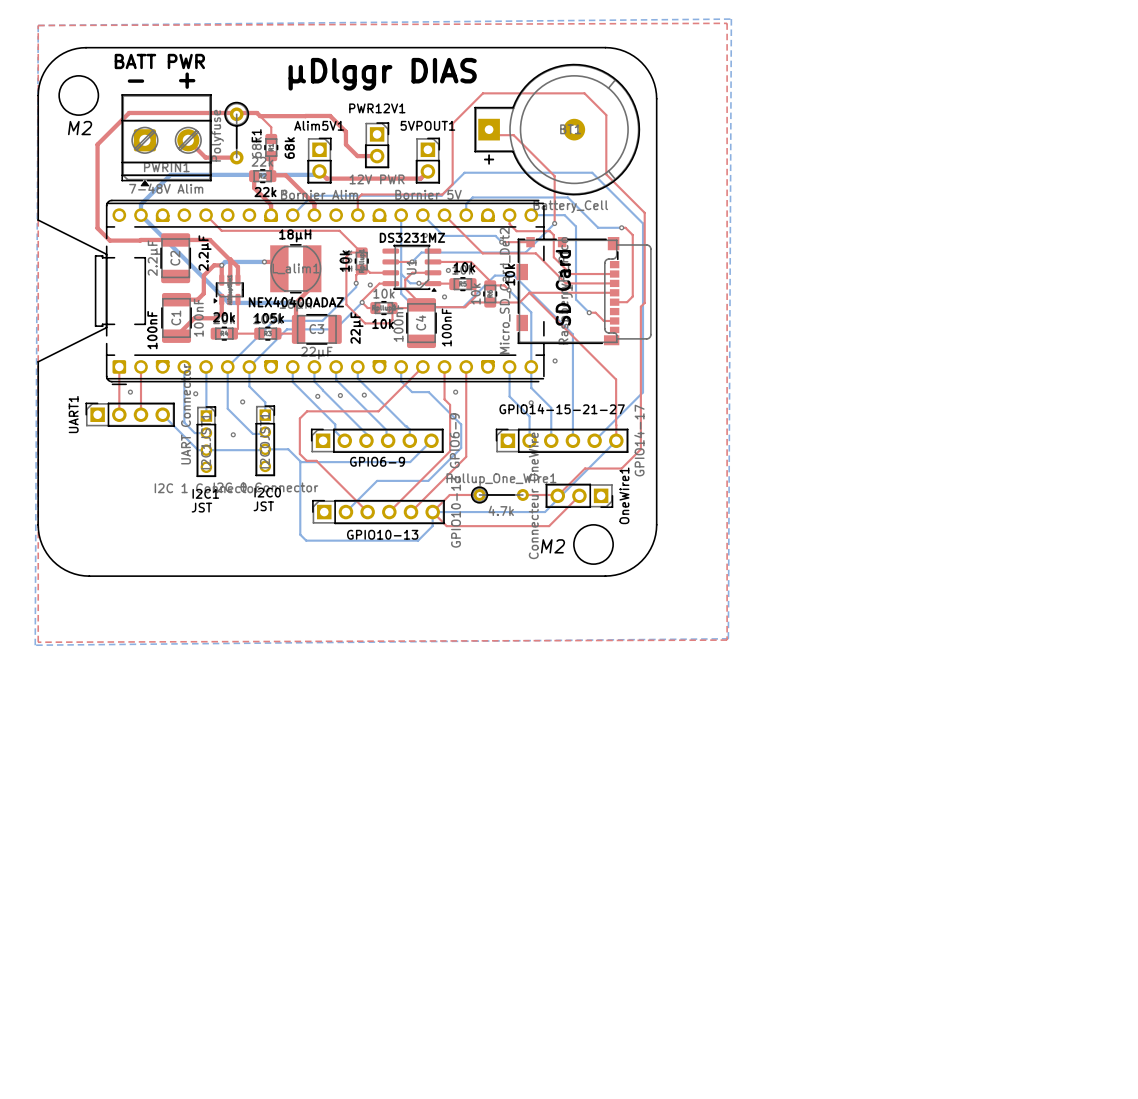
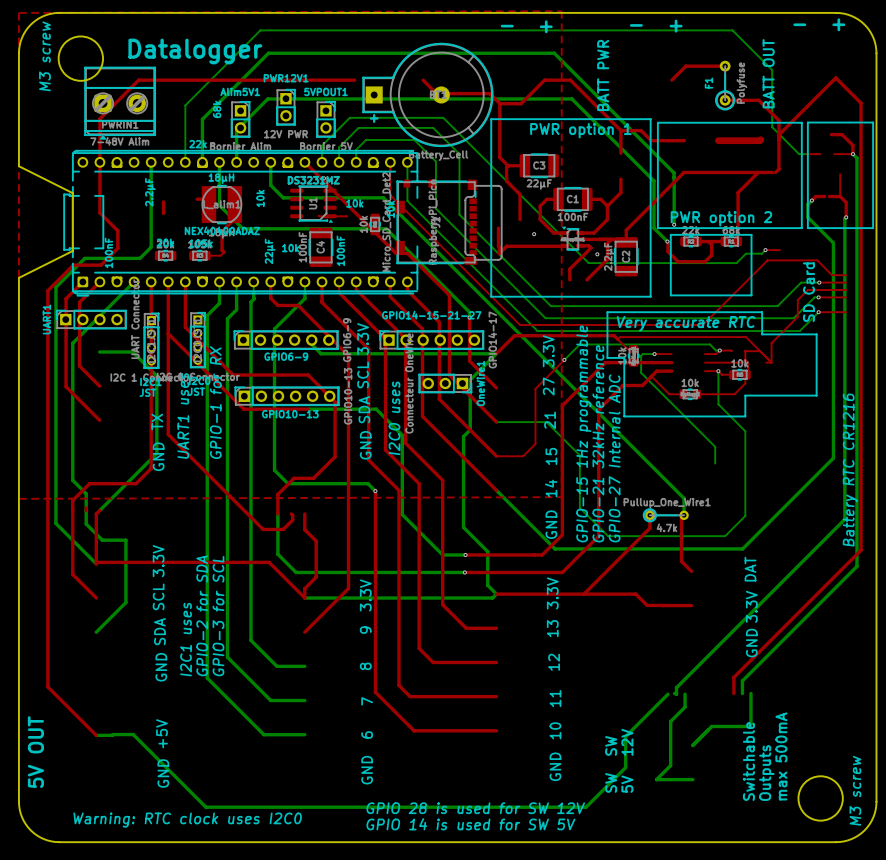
bottom zone outline: (731, 19) (38, 25) (35, 645) (728, 638) (731, 19) -> none
text: none -> - (799, 24)
text: none -> + (838, 24)
text: none -> - (636, 25)
text: none -> - (507, 26)
text: none -> + (676, 26)
text: none -> + (546, 26)
round board edge: none -> [58, 36, 104, 82]
text: BATT PWR (159, 61) -> none
text: none -> Datalogger (195, 51)
text: µDlggr DIAS (382, 74) -> none
round board edge: [58, 75, 99, 116] -> none
text: none -> M3 screw (44, 56)
text: + (187, 80) -> none
text: - (135, 81) -> none
top track: none -> (725, 66) (685, 66) (671, 80)
board edge: (38, 95) (41, 77) (49, 65) (63, 53) (81, 47) (605, 47) (620, 49) (633, 56) (650, 74) (656, 98) (656, 524) (654, 539) (648, 553) (637, 564) (625, 572) (610, 575) (89, 576) (74, 573) (60, 567) (49, 557) (39, 534) (38, 361) -> (18, 68) (19, 45) (25, 30) (40, 17) (55, 13) (836, 12) (851, 15) (861, 22) (873, 37) (876, 53) (876, 801) (874, 813) (869, 824) (855, 837) (836, 842) (59, 842) (47, 840) (36, 835) (23, 820) (18, 801) (18, 277)
text: none -> BATT OUT (768, 73)
text: none -> BATT PWR (603, 75)
top track: none -> (354, 80) (138, 80) (99, 118) (99, 212) (117, 230) (117, 248) (101, 265) (73, 265) (47, 290) (47, 686) (96, 735)
top track: none -> (423, 80) (436, 93) (489, 93) (499, 103)
top track: (260, 116) (330, 115) (345, 131) (345, 144) (357, 156) (377, 156) -> none
top track: (260, 116) (257, 112) (129, 112) (97, 144) (97, 228) (109, 240) (210, 239) (230, 259) -> none
top track: (260, 116) (271, 127) (271, 139) -> none
text: M2 (80, 128) -> none
F1 rotation: 0° (236, 133) -> 180° (725, 85)
F1 position: (236, 133) -> (725, 85)
top track: (489, 135) (513, 135) (554, 176) (554, 223) -> none
top track: none -> (725, 100) (758, 100) (778, 120) (778, 169) (775, 172)
top track: (188, 140) (205, 157) (236, 157) -> none
top track: none -> (499, 103) (499, 157) (508, 165)
top track: none -> (499, 103) (521, 103) (544, 80) (570, 80) (620, 130)
part rotation: 0° (271, 147) -> 90° clockwise (731, 241)
part position: (271, 147) -> (731, 241)
top track: (271, 156) (271, 176) (285, 175) (314, 203) (314, 215) -> none
line: none -> (491, 119) (650, 119) (650, 296) (491, 296) (491, 119)
line: none -> (657, 122) (801, 122) (801, 228) (657, 228) (657, 122)
line: none -> (807, 122) (873, 122) (873, 228) (807, 228) (807, 122)
top track: (319, 171) (326, 178) (420, 178) (427, 171) -> none
bottom track: (319, 171) (316, 174) (170, 174) (141, 204) (141, 215) (228, 302) (296, 302) -> none
top track: none -> (620, 130) (620, 153)
top track: none -> (620, 130) (641, 130) (651, 140) (684, 140)
text: none -> PWR option 1 (580, 130)
top track: (254, 176) (254, 188) (271, 204) (271, 215) -> none
part position: (262, 176) -> (690, 241)
top track: none -> (831, 134) (842, 134) (852, 145) (852, 154) (834, 154)
top track: none -> (778, 134) (835, 77) (861, 103) (861, 550) (733, 677) (733, 693)
bottom track: none -> (414, 140) (435, 161) (435, 208) (545, 318) (793, 318) (814, 297) (818, 297)
top track: none -> (760, 139) (718, 140)
bottom track: (466, 203) (472, 197) (567, 197) (598, 227) (621, 227) -> (356, 153) (356, 149) (366, 140) (415, 140)
top track: none -> (807, 154) (820, 154)
bottom track: none -> (807, 154) (799, 154) (772, 127) (772, 70) (732, 30) (260, 30) (185, 105) (185, 162)
bottom track: none -> (852, 154) (856, 158) (856, 566) (742, 680) (742, 693)
via: none -> (852, 154)
top track: (206, 215) (221, 230) (339, 230) (361, 252) -> none
bottom track: none -> (151, 162) (151, 247) (140, 258) (84, 258) (55, 287) (55, 523) (96, 563)
bottom track: none -> (202, 162) (202, 119) (268, 53) (554, 53) (674, 172) (674, 224)
bottom track: (292, 215) (312, 195) (441, 195) (464, 172) (592, 172) (643, 223) (643, 392) (594, 440) -> (219, 162) (219, 205) (242, 228) (386, 228) (469, 312) (469, 317)
bottom track: none -> (236, 162) (236, 130) (267, 98) (571, 98) (653, 181) (653, 228) (667, 241)
top track: (357, 215) (357, 198) (361, 194) (442, 194) (452, 184) (452, 123) (482, 93) (584, 93) (606, 115) (606, 174) (644, 212) (644, 302) (640, 306) (640, 449) (621, 468) (585, 468) (557, 495) (522, 494) -> none
bottom track: none -> (270, 162) (270, 185) (283, 197) (383, 197) (684, 498) (684, 515)
top track: none -> (304, 162) (395, 253) (407, 253) (449, 295) (449, 375) (496, 422)
bottom track: (401, 215) (401, 293) (416, 309) (427, 309) (429, 307) (463, 307) (494, 275) (514, 275) (572, 334) (572, 440) -> none
bottom track: (422, 215) (443, 235) (495, 235) (501, 242) -> (322, 162) (322, 145) (349, 117) (443, 117) (588, 263) (736, 263) (746, 253) (761, 253) (765, 250)
top track: (444, 215) (482, 253) (535, 253) (565, 283) (614, 283) -> none
bottom track: none -> (339, 162) (339, 147) (358, 127) (433, 127) (459, 154) (459, 214) (550, 306) (777, 306) (801, 282) (819, 282)
bottom track: (531, 215) (564, 215) (576, 226) (576, 299) (589, 312) -> (407, 162) (407, 200) (537, 331) (799, 331) (818, 312)
top track: none -> (508, 165) (506, 181) (520, 194) (520, 219)
top track: none -> (508, 165) (524, 165)
bottom track: (554, 223) (525, 252) (421, 252) (412, 261) -> none
via: (554, 223) -> none
top track: (509, 224) (516, 231) (549, 231) (553, 235) (553, 257) (570, 274) (614, 274) -> (390, 169) (390, 195) (520, 324) (702, 324) (767, 260) (817, 260) (832, 275) (846, 275)
top track: (621, 227) (625, 227) (632, 235) (632, 296) (627, 302) (614, 302) -> none
via: (621, 227) -> none
top track: none -> (758, 172) (738, 192) (738, 241)
top track: none -> (772, 172) (683, 172) (626, 230) (626, 239) (623, 241)
top track: none -> (840, 174) (840, 196)
top track: none -> (620, 179) (620, 192) (607, 206)
top track: (501, 242) (530, 242) -> none
via: (501, 242) -> none
top track: (366, 252) (350, 252) (346, 256) (346, 304) (365, 323) (389, 323) (392, 319) (392, 308) (420, 308) (425, 302) -> none
C2 position: (175, 258) -> (626, 256)
top track: none -> (824, 196) (815, 196) (811, 200)
top track: none -> (829, 196) (840, 196)
top track: none -> (840, 196) (846, 202) (846, 217)
top track: (230, 259) (237, 267) (237, 280) -> none
top track: (230, 259) (229, 280) -> none
bottom track: (264, 261) (225, 261) (221, 265) -> none
via: (264, 261) -> none
part position: (361, 261) -> (633, 355)
top track: (390, 261) (412, 261) -> none
via: (412, 261) -> none
top track: (433, 261) (471, 261) (489, 280) (490, 285) (504, 285) (509, 290) -> none
top track: none -> (558, 199) (546, 199) (540, 206) (540, 219) (553, 233) (565, 233)
top track: none -> (587, 199) (600, 199) (607, 206)
bottom track: none -> (811, 200) (807, 204) (807, 217) (833, 242) (833, 458) (742, 548) (554, 548) (496, 490)
via: none -> (811, 200)
via: (221, 265) -> none
top track: (222, 265) (214, 265) (203, 275) (203, 293) (197, 299) (176, 299) -> none
via: (448, 270) -> none
top track: none -> (607, 206) (607, 219) (594, 233) (580, 233)
top track: (390, 272) (370, 272) (366, 269) (361, 269) (356, 275) (356, 283) -> none
top track: (433, 272) (412, 272) (405, 279) (405, 288) (419, 302) (425, 302) -> none
bottom track: (401, 274) (410, 283) (418, 283) -> none
bottom track: (356, 283) (356, 287) (322, 320) (273, 320) (227, 366) (227, 408) (252, 433) (265, 433) -> none
via: (356, 283) -> none
top track: (390, 283) (379, 283) (362, 300) (367, 308) (378, 308) -> none
via: (418, 283) -> none
via: (370, 284) -> none
part position: (462, 284) -> (739, 374)
top track: (475, 284) (475, 296) (465, 307) (430, 307) (425, 302) -> none
bottom track: none -> (846, 217) (844, 519) (676, 687) (676, 694) (674, 693)
via: none -> (846, 217)
text: none -> PWR option 2 (721, 218)
text: SD Card (563, 287) -> none
part rotation: 0° (228, 289) -> 90° clockwise (572, 238)
part position: (228, 289) -> (572, 238)
bottom track: (509, 290) (531, 312) (531, 387) (551, 407) (551, 440) -> none
via: (509, 290) -> none
top track: (529, 292) (616, 379) (616, 440) -> none
top track: (529, 292) (519, 302) (469, 302) -> none
top track: (529, 292) (614, 292) -> none
via: none -> (674, 224)
via: (444, 296) -> none
top track: none -> (498, 228) (499, 253) (506, 246) (565, 245)
top track: (221, 299) (221, 313) (216, 318) (194, 318) (176, 336) -> none
top track: (237, 299) (237, 328) (232, 333) (255, 333) -> none
bottom track: (362, 302) (335, 329) (286, 329) (249, 366) (249, 386) (265, 402) (265, 416) -> none
via: (362, 302) -> none
via: none -> (534, 234)
line: none -> (670, 234) (751, 234) (751, 295) (670, 295) (670, 234)
part position: (383, 308) -> (690, 394)
top track: (589, 312) (595, 312) (603, 320) (614, 320) -> none
via: (589, 312) -> none
top track: none -> (580, 239) (620, 239)
top track: none -> (611, 239) (607, 243) (607, 259) (586, 279)
top track: none -> (667, 241) (667, 251) (678, 261) (704, 261) (711, 255) (711, 244) (708, 241)
via: none -> (667, 241)
top track: none -> (697, 241) (724, 241)
C1 rotation: 0° (176, 317) -> 90° clockwise (572, 199)
C1 position: (176, 317) -> (572, 199)
top track: none -> (580, 245) (588, 245) (590, 247) (569, 269) (569, 279)
top track: none -> (765, 250) (779, 250)
via: none -> (765, 250)
C3 position: (316, 329) -> (539, 165)
via: none -> (597, 254)
via: (555, 360) -> none
top track: (119, 366) (119, 414) -> (82, 281) (66, 298) (66, 386) (99, 420)
top track: (141, 366) (141, 414) -> (99, 281) (79, 302) (79, 366) (99, 386)
bottom track: (184, 366) (184, 422) (194, 433) (206, 433) -> (134, 281) (72, 343) (72, 480) (86, 493) (86, 524) (102, 540) (125, 540) (125, 602) (96, 632)
top track: none -> (151, 281) (151, 468) (135, 483) (89, 483) (72, 500) (72, 574) (96, 598)
bottom track: (206, 366) (206, 416) -> none
top track: none -> (168, 281) (168, 434) (263, 529) (283, 529) (292, 520) (291, 513)
top track: none -> (185, 281) (185, 327) (233, 375) (308, 375) (335, 401) (335, 456) (313, 478) (294, 478) (277, 494) (277, 513)
top track: none -> (270, 281) (270, 298) (277, 305) (298, 305) (348, 355) (348, 588) (304, 632)
bottom track: (357, 366) (357, 378) (409, 429) (409, 440) -> none
top track: (422, 366) (378, 411) (307, 411) (299, 418) (299, 454) (306, 460) (316, 460) (367, 512) -> (322, 281) (321, 302) (368, 349) (368, 460) (398, 490) (398, 685) (410, 696) (496, 696)
top track: none -> (390, 281) (390, 296) (422, 329) (422, 416) (496, 490)
bottom track: (509, 366) (509, 396) (529, 416) (529, 440) -> none
top track: none -> (407, 281) (407, 290) (439, 322) (439, 399) (496, 456) (523, 456) (535, 444) (535, 388) (564, 359)
top track: none -> (819, 282) (846, 282)
via: none -> (819, 282)
top track: (466, 376) (466, 456) (411, 512) -> (356, 289) (405, 339) (405, 443) (442, 480) (442, 604) (466, 628) (496, 628)
top track: none -> (846, 290) (807, 290) (797, 300) (797, 316) (771, 343) (771, 362)
bottom track: (336, 379) (386, 430) (388, 440) -> (253, 292) (254, 298) (250, 302) (250, 640) (276, 666) (304, 666)
top track: (444, 380) (444, 399) (450, 404) (450, 451) (389, 512) -> (339, 292) (385, 339) (385, 450) (419, 483) (419, 648) (433, 662) (496, 662)
text: none -> SD Card (808, 292)
bottom track: (314, 381) (366, 433) (366, 440) -> (236, 293) (236, 309) (227, 318) (227, 657) (270, 700) (304, 700)
bottom track: (401, 381) (412, 392) (428, 392) (461, 424) (461, 448) (428, 480) (377, 480) (345, 512) -> (304, 293) (304, 298) (274, 329) (274, 470) (287, 483) (368, 483) (375, 491)
bottom track: (292, 382) (335, 424) (335, 431) (344, 440) -> (219, 293) (219, 303) (207, 315) (207, 678) (263, 734) (304, 734)
top track: none -> (818, 297) (846, 297)
via: none -> (818, 297)
via: (130, 392) -> none
via: (455, 392) -> none
via: (195, 393) -> none
via: (340, 395) -> none
via: (364, 395) -> none
via: (317, 396) -> none
via: (242, 401) -> none
via: (531, 402) -> none
line: none -> (607, 312) (607, 357) (624, 357) (624, 416) (745, 416) (745, 395) (816, 395) (816, 334) (762, 334) (762, 312) (607, 312)
top track: none -> (818, 312) (846, 312)
via: none -> (818, 312)
top track: none -> (469, 317) (469, 361) (496, 387)
via: none -> (469, 317)
bottom track: (162, 414) (198, 450) (265, 451) -> none
text: none -> Very accurate RTC (686, 323)
top track: none -> (168, 333) (243, 409) (308, 409)
via: (233, 434) -> none
text: none -> 3.3V (363, 339)
top track: none -> (617, 339) (614, 335) (514, 335) (496, 353)
top track: none -> (617, 339) (627, 349) (633, 349)
top track: none -> (617, 339) (620, 337) (746, 337) (771, 362)
bottom track: (431, 440) (410, 462) (301, 462) (288, 449) (265, 449) -> none
bottom track: (616, 440) (545, 512) (432, 512) (432, 526) (418, 540) (306, 540) (300, 534) (300, 461) -> none
bottom track: none -> (308, 340) (321, 353) (496, 353) (470, 379) (470, 429) (463, 436) (463, 527) (487, 551) (487, 585) (496, 594) (492, 598) (304, 598)
text: none -> 3.3V (548, 351)
bottom track: none -> (719, 350) (716, 350) (709, 344) (579, 344) (564, 359)
via: none -> (719, 350)
top track: none -> (731, 351) (719, 350) (716, 354) (704, 354)
top track: none -> (745, 350) (745, 359)
top track: none -> (745, 351) (760, 351)
bottom track: none -> (99, 352) (132, 352) (156, 376) (156, 453) (99, 510)
top track: none -> (654, 354) (671, 354)
bottom track: none -> (654, 354) (642, 354) (641, 355) (641, 372) (715, 446) (715, 463)
via: none -> (654, 354)
via: none -> (564, 359)
top track: none -> (745, 359) (748, 362) (745, 383) (734, 394) (696, 394)
top track: none -> (745, 359) (742, 362) (704, 362)
top track: none -> (671, 362) (605, 362) (562, 405) (562, 534) (542, 554) (465, 554)
top track: none -> (766, 362) (771, 362)
top track: none -> (671, 371) (656, 371) (642, 385) (622, 385) (598, 409) (598, 536) (562, 572) (464, 572)
top track: none -> (704, 371) (718, 371) (721, 374) (733, 374)
bottom track: none -> (718, 371) (718, 404) (745, 431) (745, 515) (725, 536) (608, 536) (579, 507) (579, 455) (546, 422) (496, 422)
via: none -> (718, 371)
text: none -> SCL (363, 374)
top track: none -> (651, 376) (669, 394) (683, 394)
top track: (479, 494) (449, 494) (432, 512) (446, 526) (549, 526) (579, 495) -> none
Pullup_One_Wire1 position: (500, 494) -> (666, 515)
text: none -> 27 (548, 386)
text: none -> GPIO-1 for RX (215, 402)
round board edge: [573, 524, 614, 565] -> none
bottom track: none -> (308, 409) (376, 409) (402, 435) (402, 514) (442, 554) (465, 554)
text: none -> SDA (364, 409)
text: none -> UART1 uses (183, 415)
text: none -> I2C0 uses (394, 418)
text: none -> 21 (550, 420)
text: none -> TX (157, 422)
text: M2 (553, 546) -> none
text: none -> GPIO-15 1Hz programmable (583, 433)
text: none -> GPIO-21 32kHz reference (598, 443)
text: none -> GND (365, 445)
text: none -> GND (158, 456)
text: none -> 15 (551, 456)
text: none -> GPIO-27 Internal ADC (614, 458)
text: none -> Battery RTC CR1216 (850, 470)
text: none -> 14 (551, 488)
top track: none -> (375, 491) (375, 692) (414, 730) (496, 730)
via: none -> (375, 491)
top track: none -> (86, 507) (86, 510)
top track: none -> (99, 510) (96, 513) (96, 563) (269, 562) (304, 598) (304, 588) (316, 577) (316, 541) (304, 529) (304, 513)
bottom track: none -> (277, 513) (277, 554) (296, 572) (464, 572)
top track: none -> (649, 515) (649, 528) (583, 594)
top track: none -> (684, 515) (681, 517) (681, 561) (691, 571)
text: none -> GND (551, 524)
via: none -> (465, 554)
text: none -> 3.3V (158, 561)
text: none -> DAT (750, 569)
via: none -> (464, 572)
text: none -> 3.3V (552, 593)
top track: none -> (496, 594) (635, 594) (647, 605) (691, 605)
text: none -> 3.3V (365, 595)
text: none -> SCL (158, 596)
text: none -> 3.3V (751, 606)
text: none -> GPIO-2 for SDA (202, 615)
text: none -> GPIO-3 for SCL (218, 616)
text: none -> 13 (552, 628)
text: none -> 9 (365, 630)
text: none -> SDA (159, 631)
text: none -> I2C1 uses (186, 639)
text: none -> GND (751, 643)
text: none -> 12 (554, 662)
text: none -> 8 (365, 666)
text: none -> GND (161, 667)
bottom track: none -> (750, 693) (750, 724) (748, 726) (711, 726) (692, 745)
bottom track: none -> (667, 694) (625, 736) (625, 767) (586, 807) (205, 807) (133, 734) (96, 735)
bottom track: none -> (685, 694) (685, 707) (670, 721) (670, 765) (656, 779) (692, 779)
text: none -> 11 (555, 698)
text: none -> 7 (367, 701)
text: none -> 10 (555, 730)
text: none -> +5V (161, 733)
text: none -> 6 (367, 734)
text: none -> 12V (627, 742)
text: none -> SW (611, 745)
text: none -> 5V OUT (35, 752)
text: none -> max 500mA (781, 756)
text: none -> Switchable (748, 761)
text: none -> GND (555, 766)
text: none -> GND (367, 770)
text: none -> GND (163, 773)
text: none -> Outputs (766, 773)
round board edge: none -> [798, 776, 844, 821]
text: none -> SW (611, 782)
text: none -> 5V (627, 784)
text: none -> M3 screw (855, 790)
text: none -> GPIO 28 is used for SW 12V (475, 808)
text: none -> Warning: RTC clock uses I2C0 (187, 820)
text: none -> GPIO 14 is used for SW 5V (470, 824)

